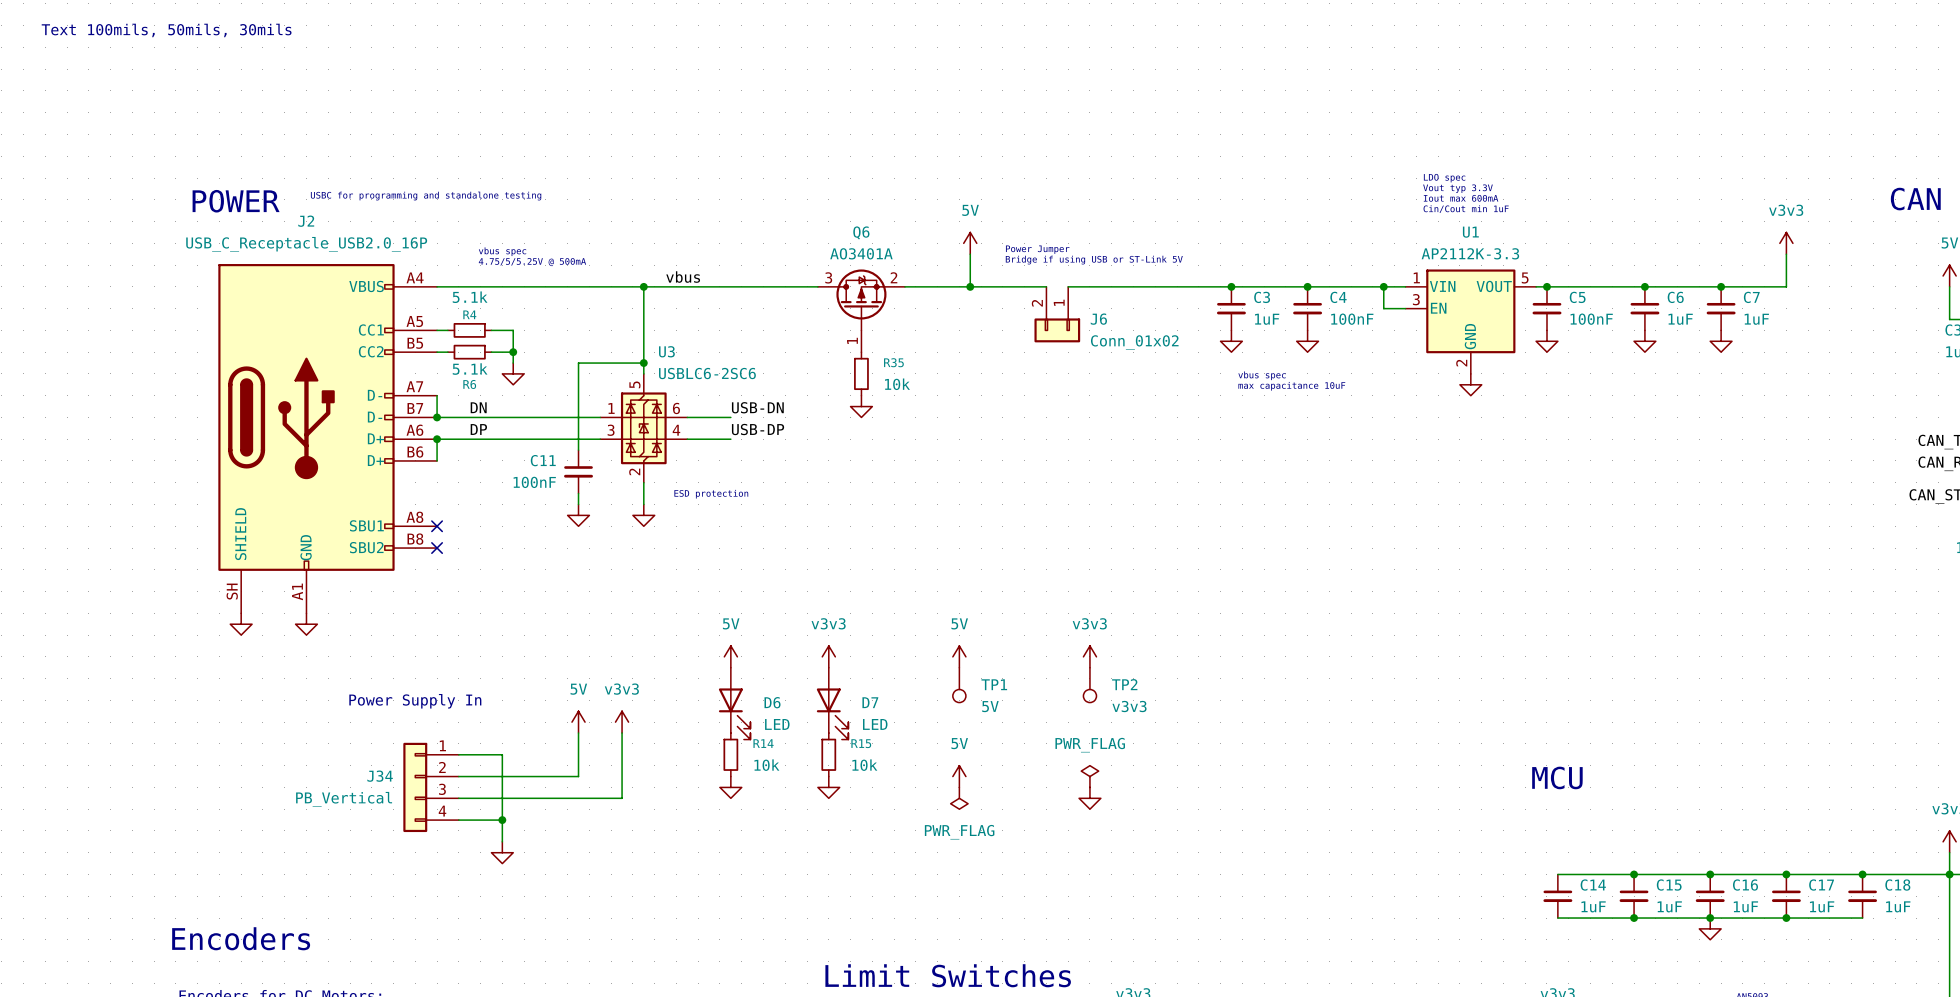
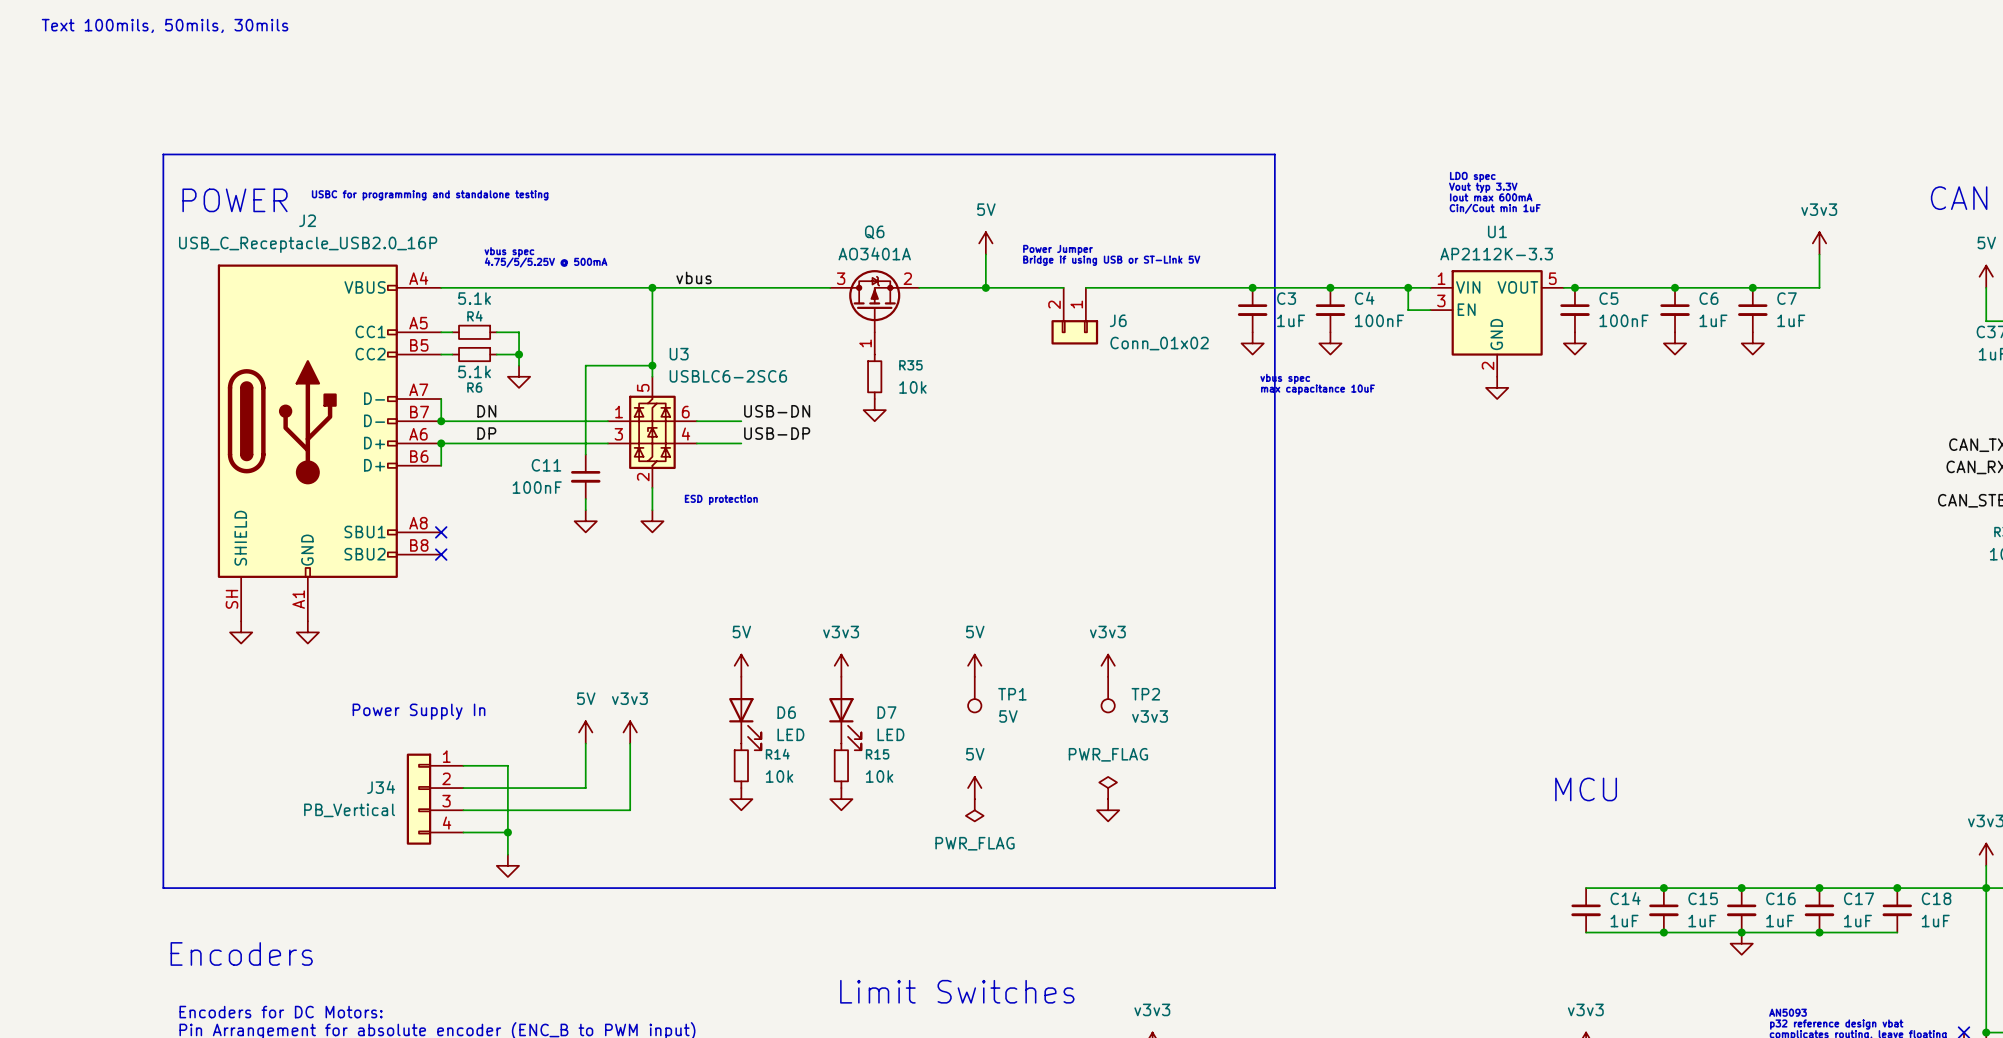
line: none -> (163, 154) (1274, 154) (1274, 888) (163, 888) (163, 154)

